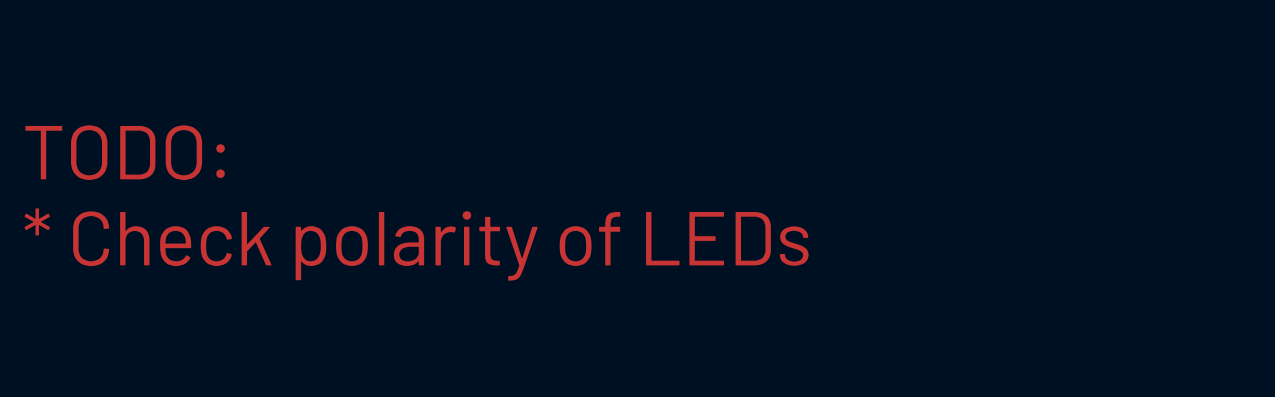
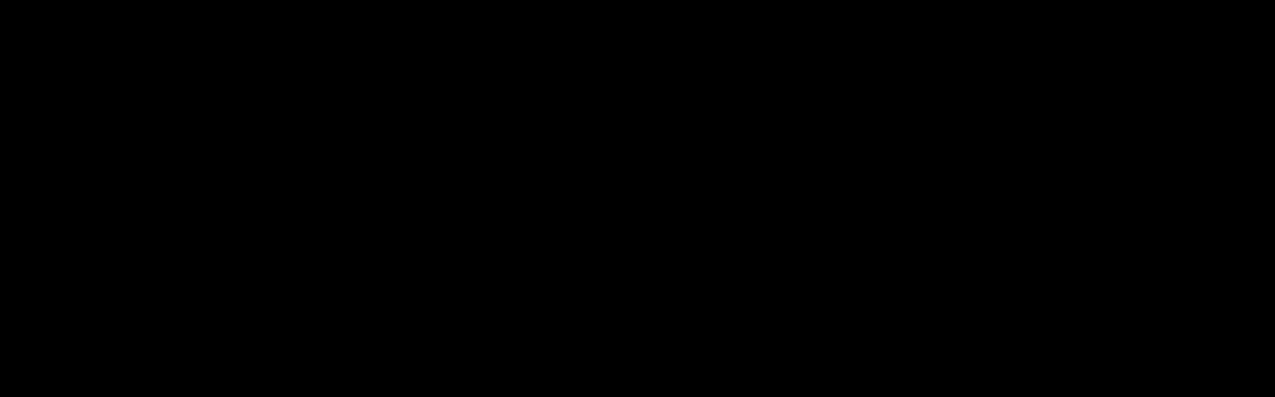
text: TODO: (125, 152) -> none
text: * Check polarity of LEDs (416, 244) -> none

